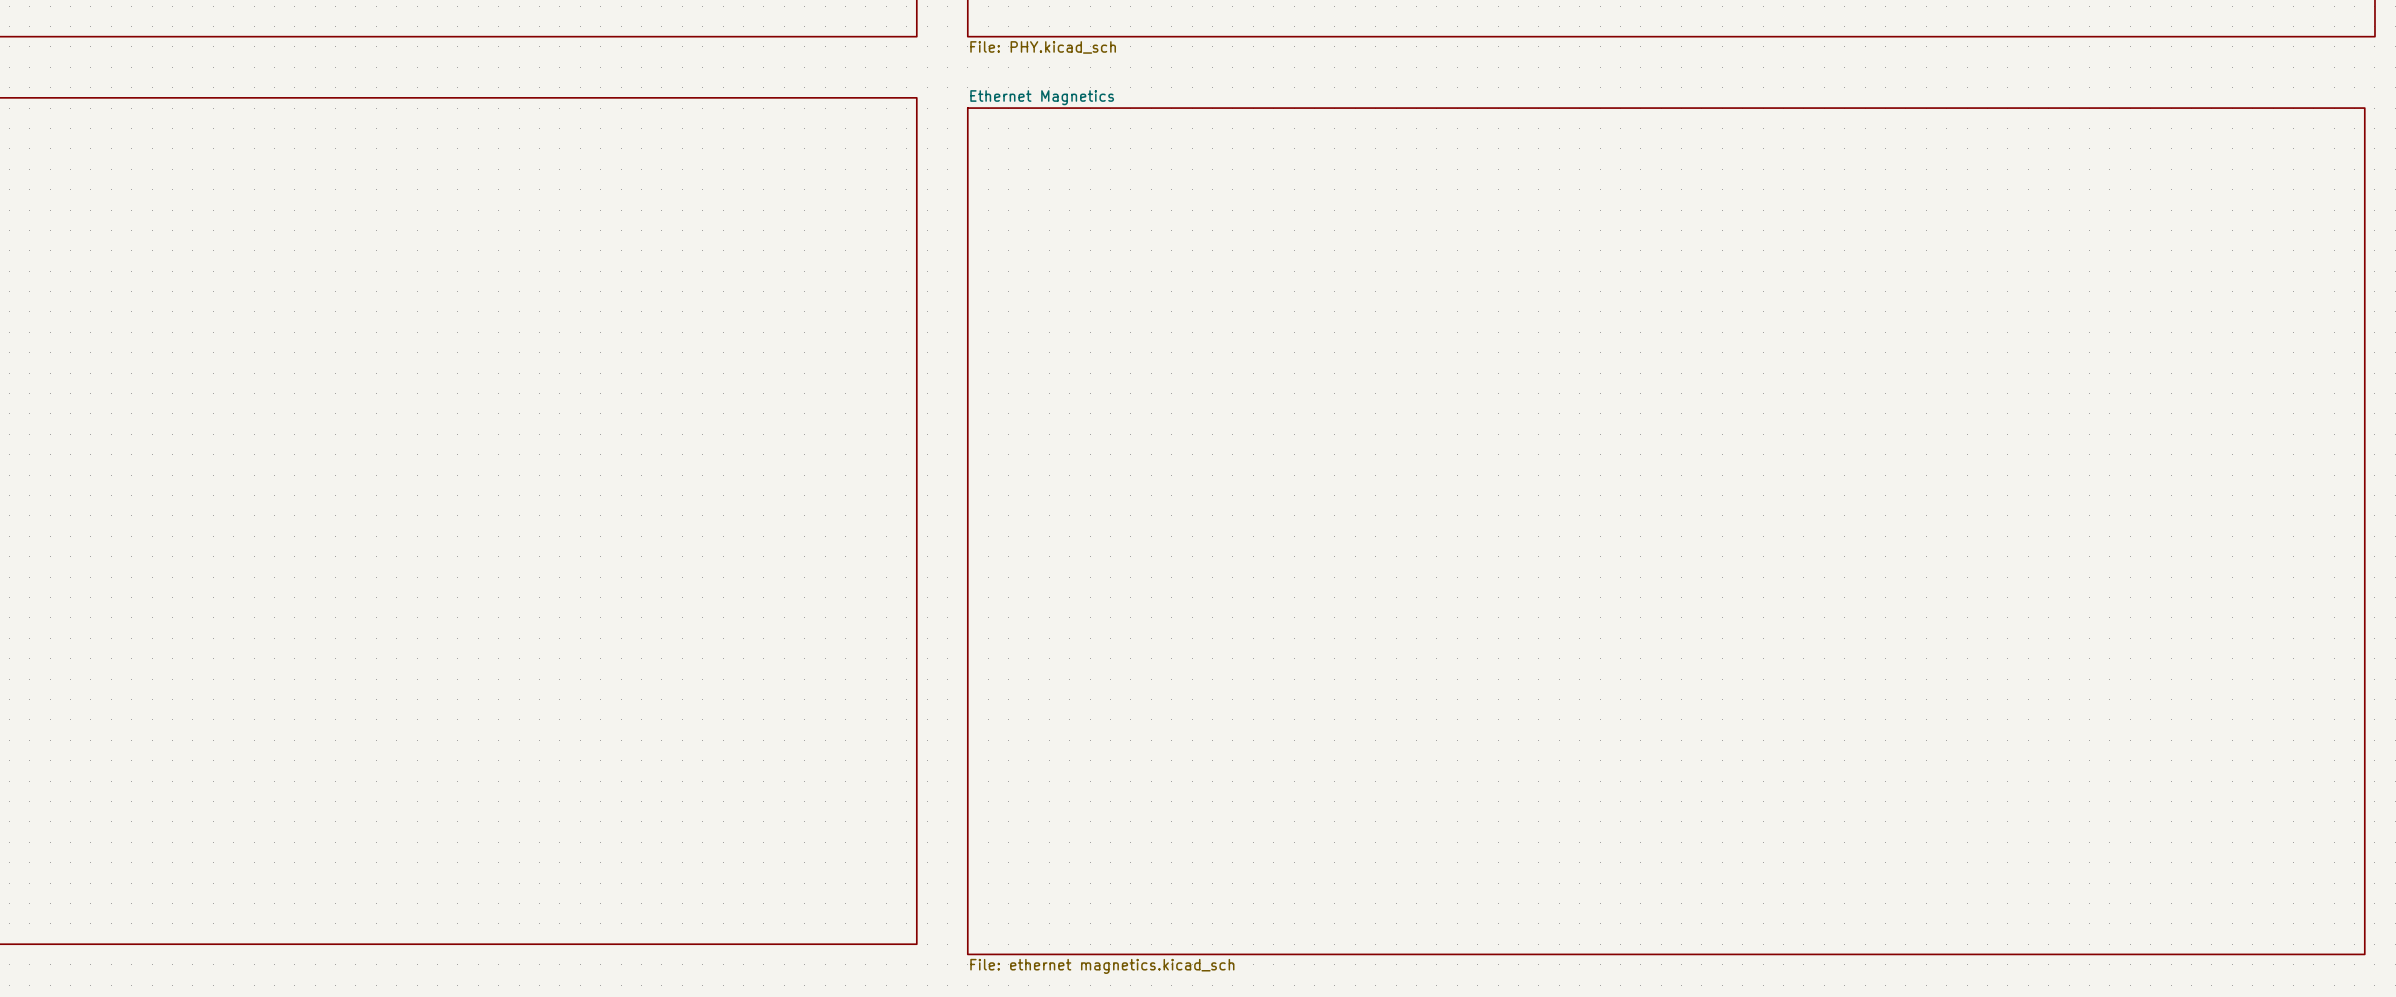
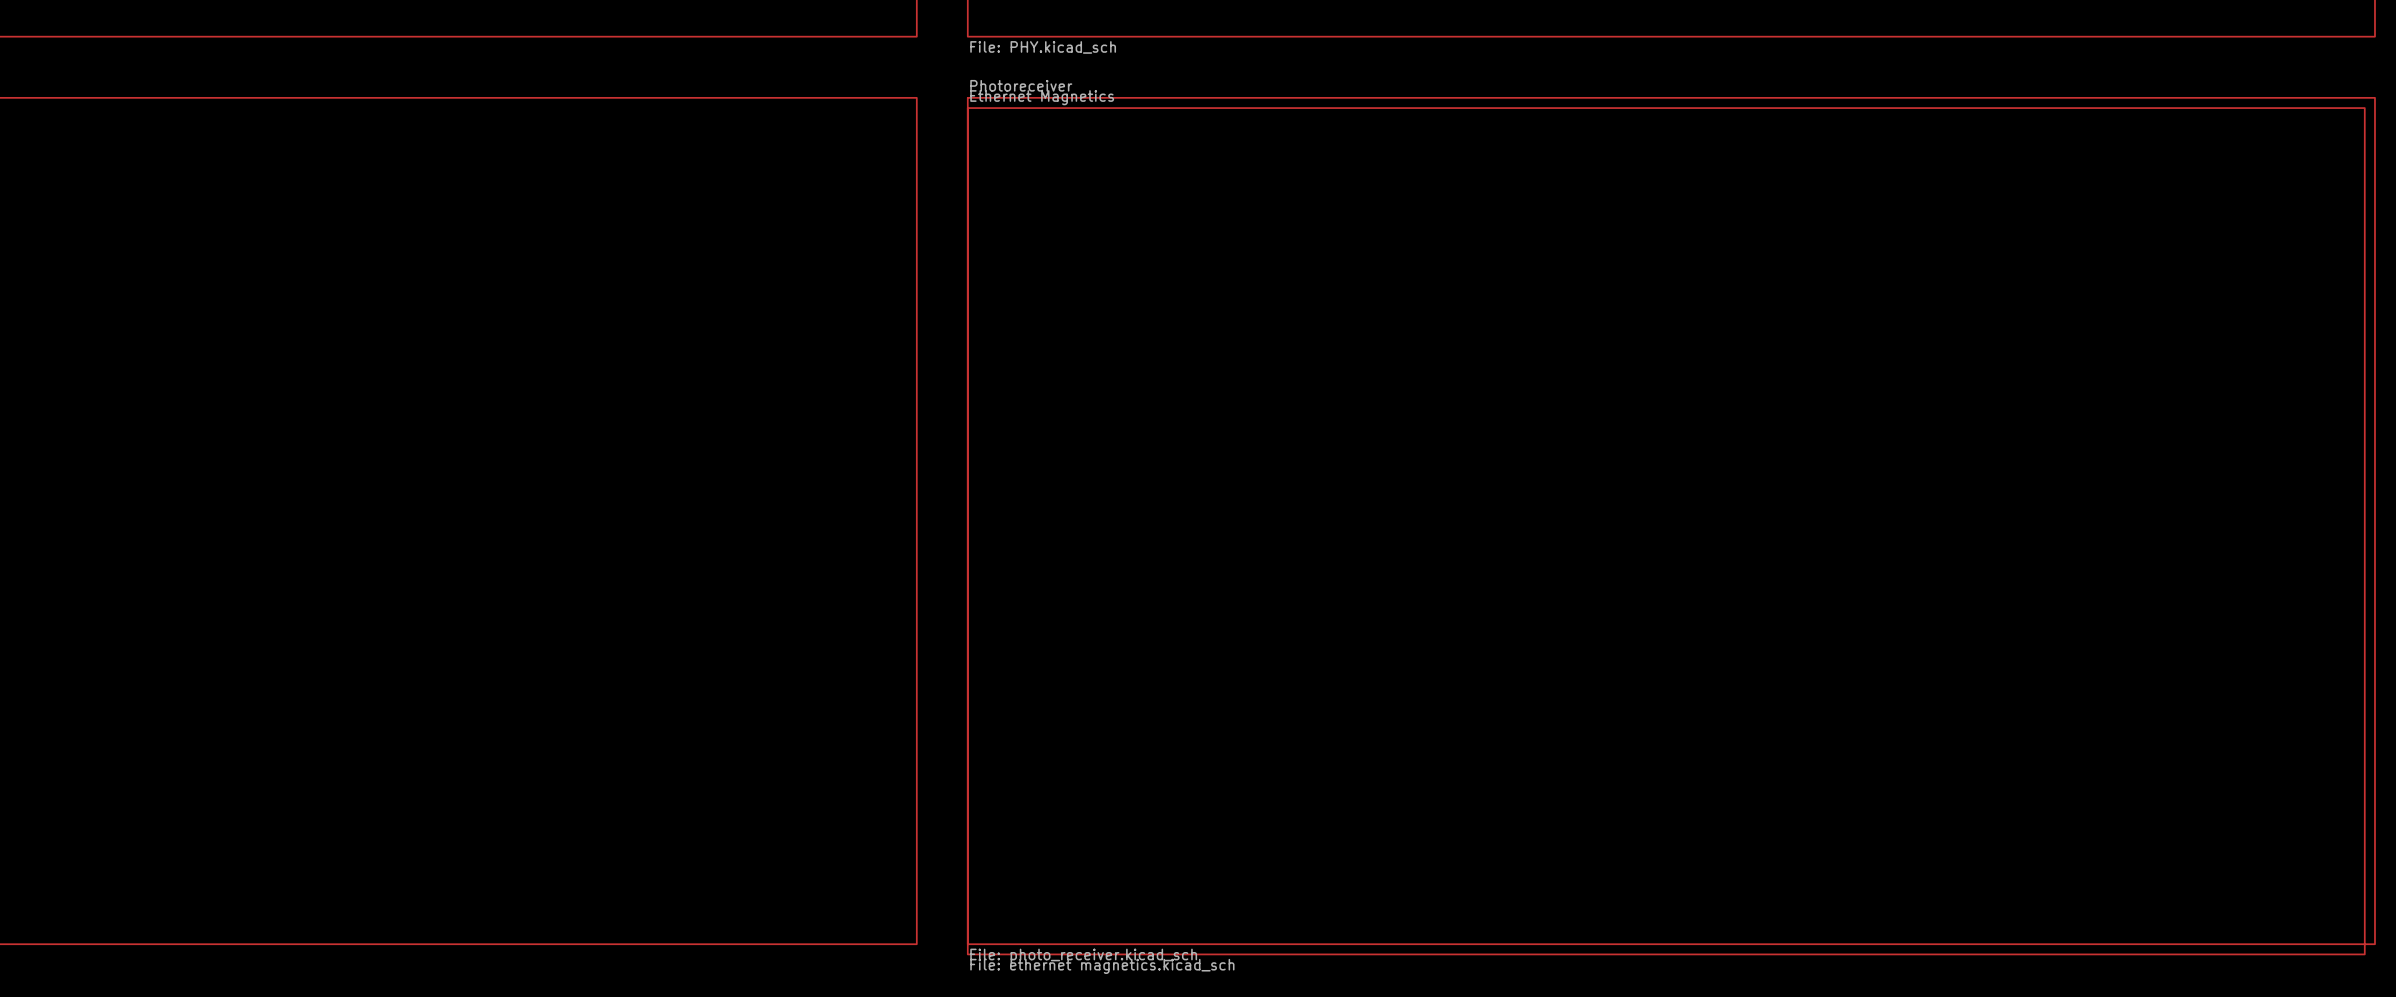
sheet Photoreceiver: none -> File: photo_receiver.kicad_sch (1671, 521)

